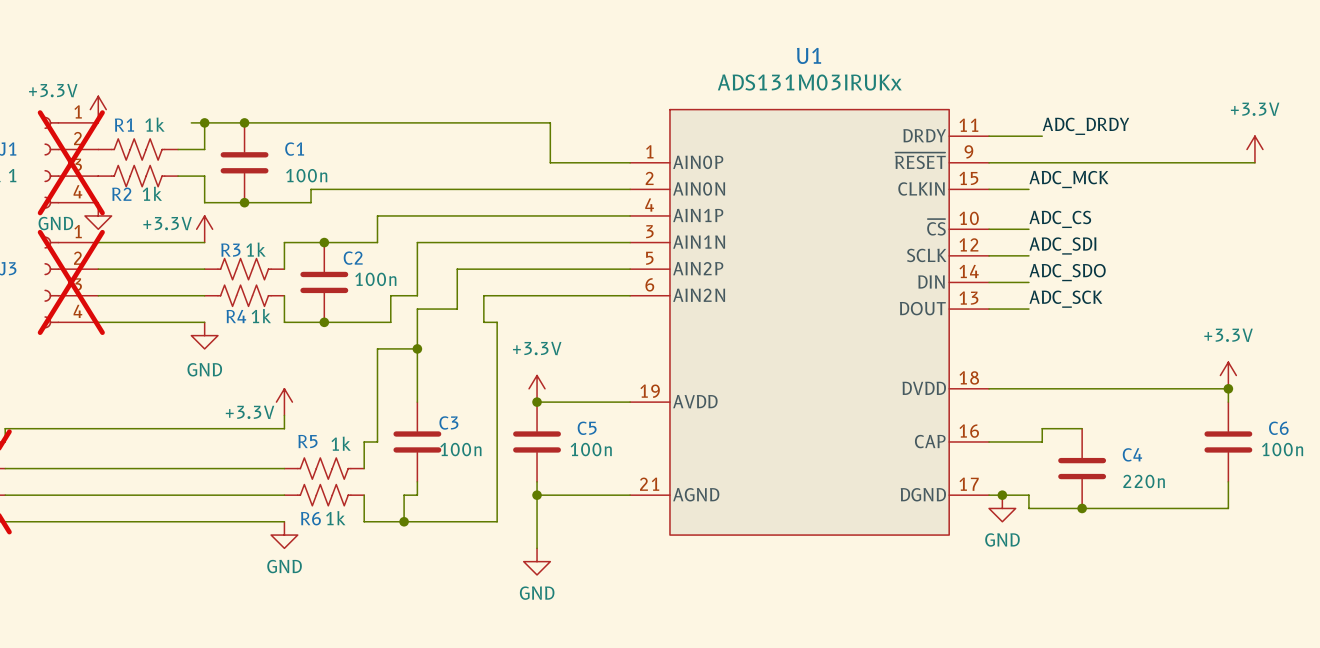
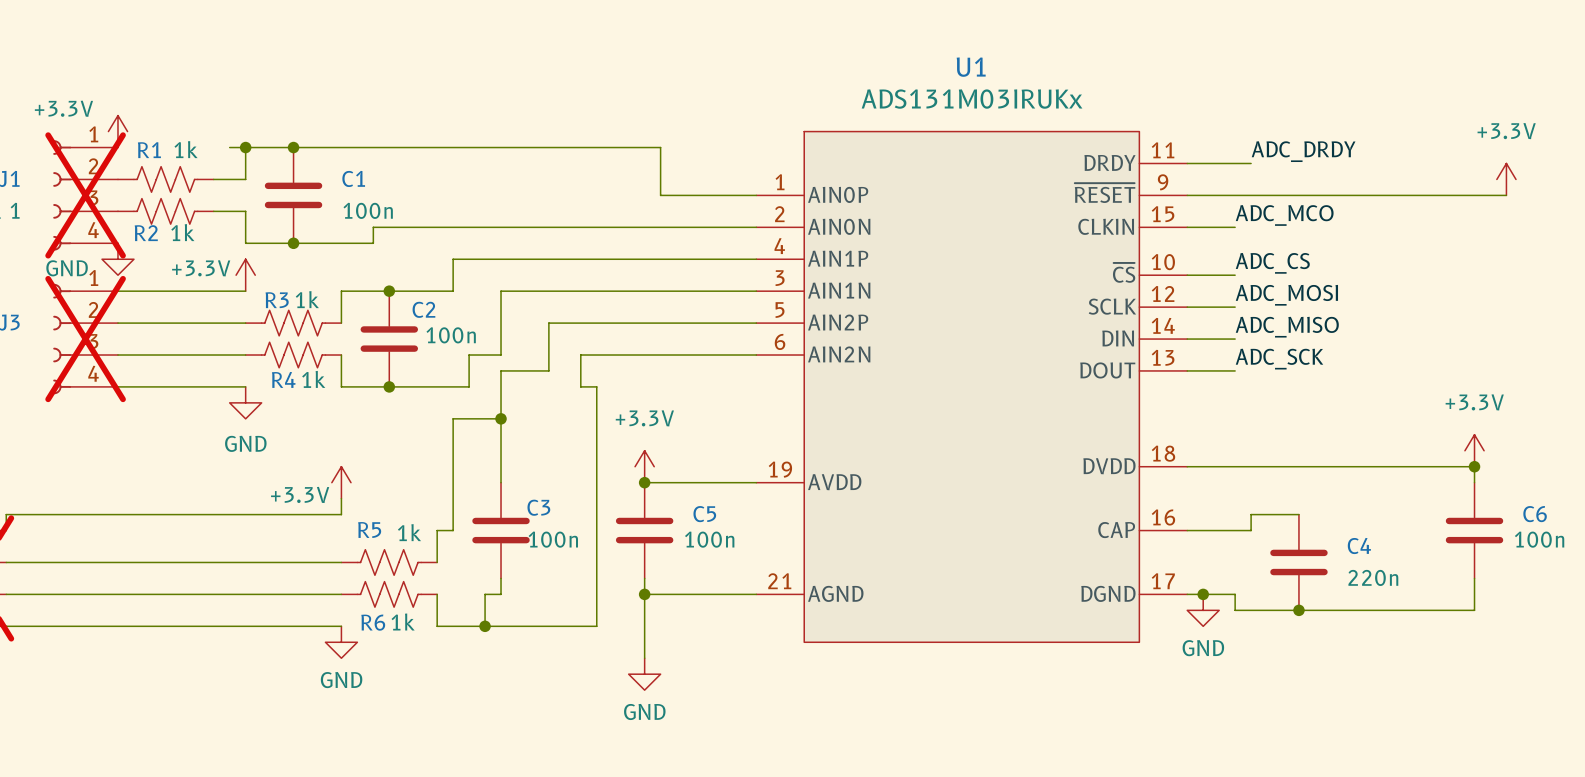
label: ADC_MCK (1068, 179) -> ADC_MCO (1284, 215)
label: ADC_SDI (1062, 245) -> ADC_MOSI (1286, 295)
label: ADC_SDO (1067, 272) -> ADC_MISO (1287, 327)

